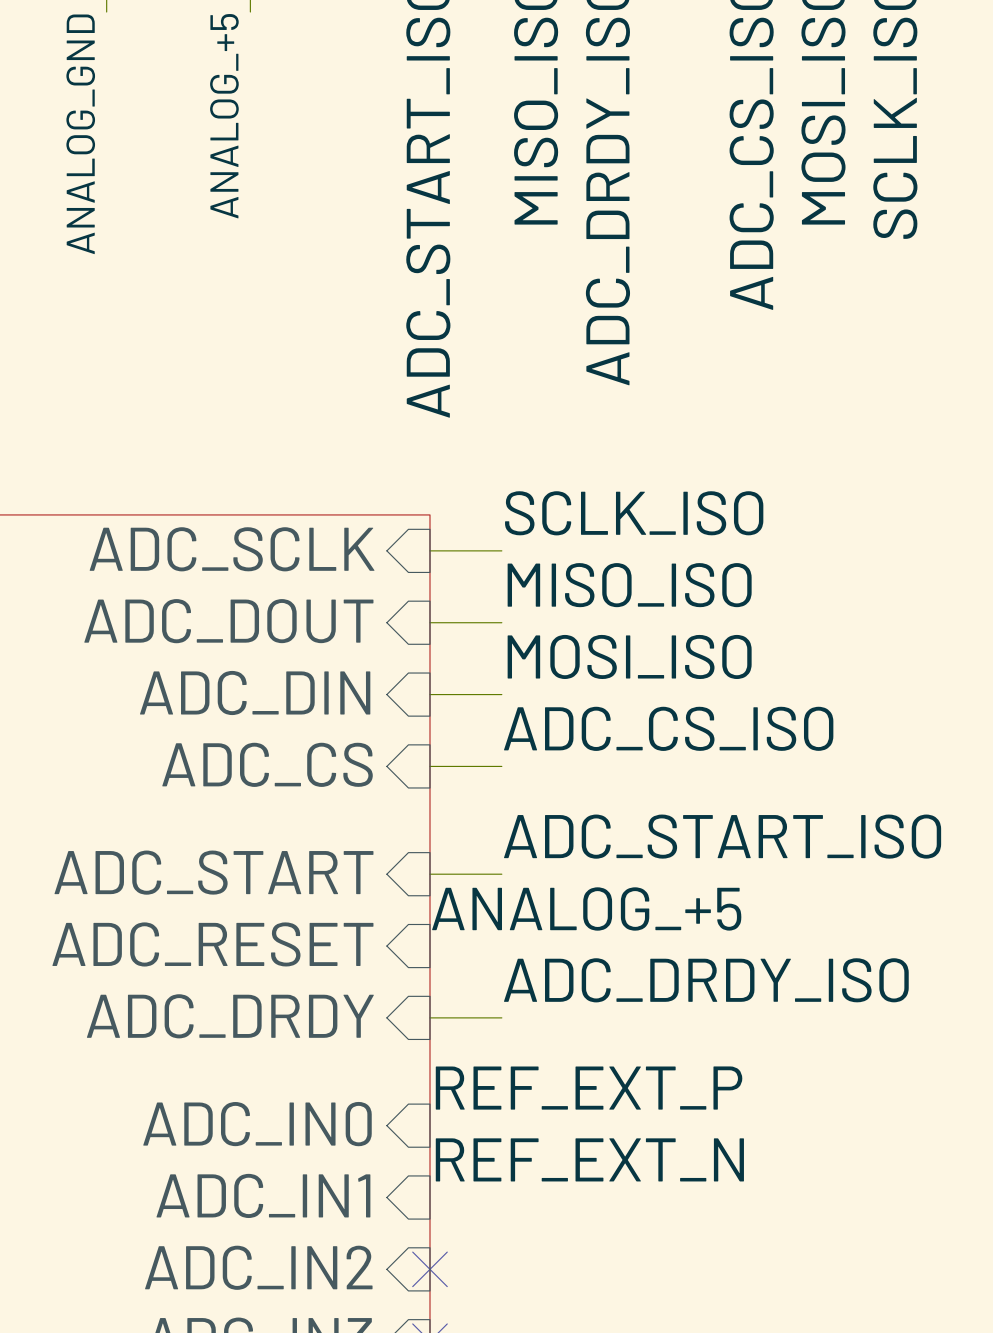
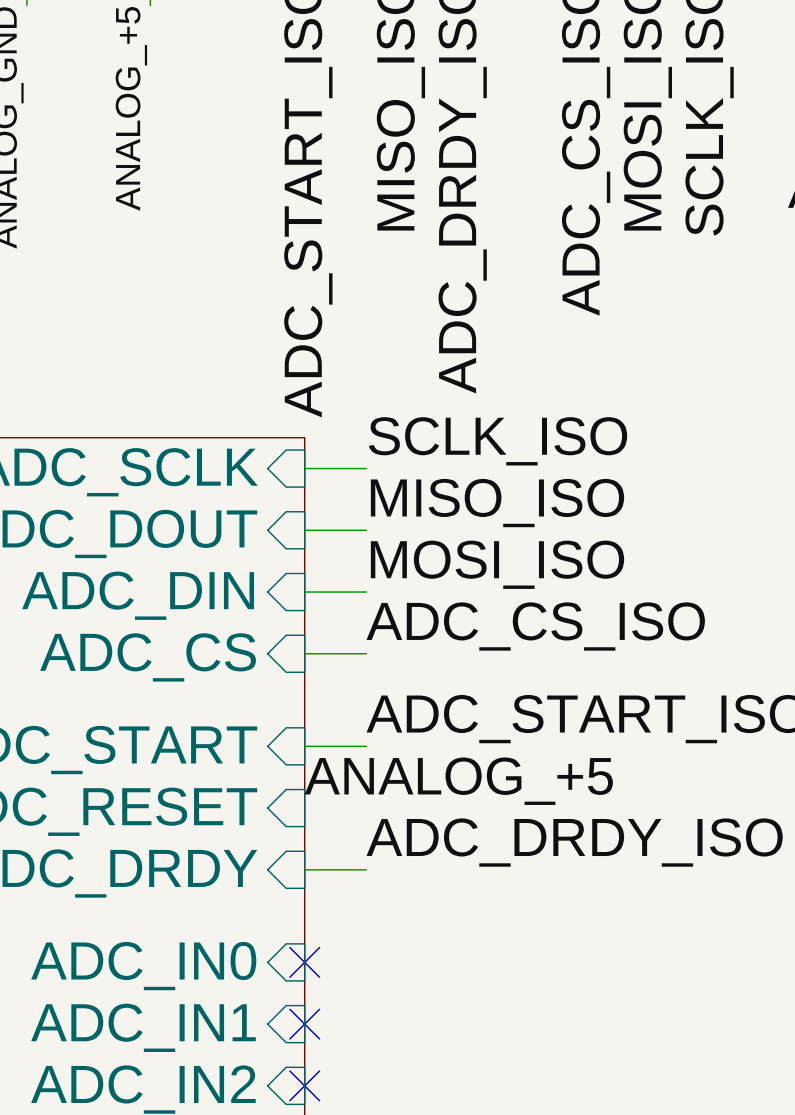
label: REF_EXT_P (589, 1088) -> none
no-connect mark: none -> (304, 962)
label: REF_EXT_N (589, 1159) -> none
no-connect mark: none -> (304, 1024)

